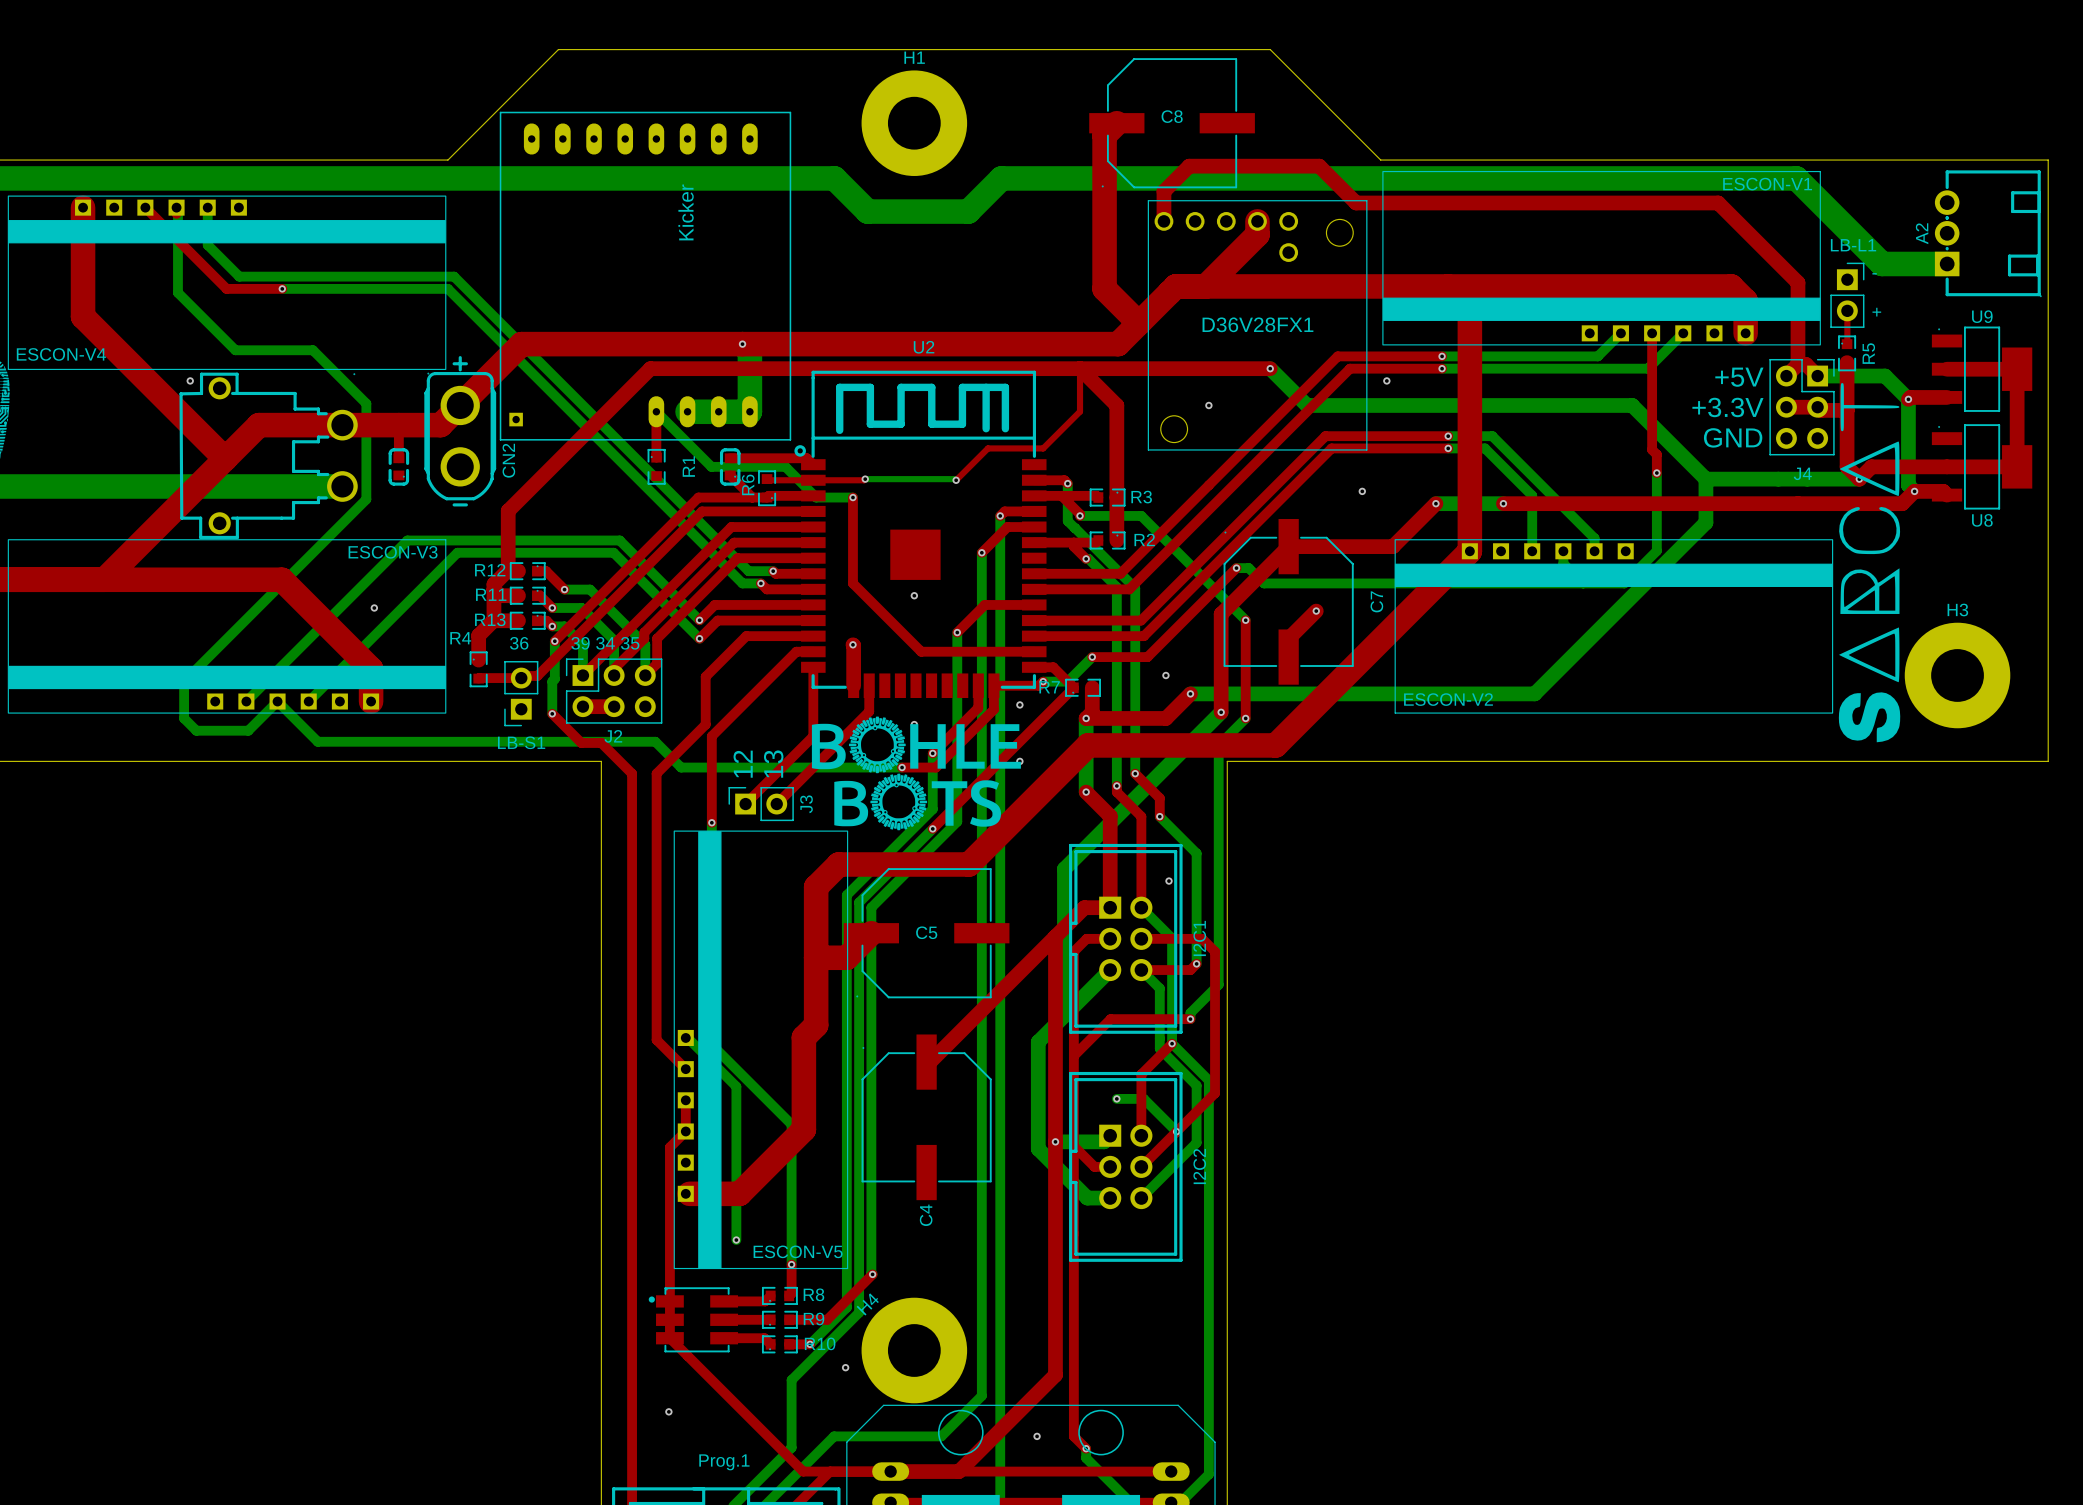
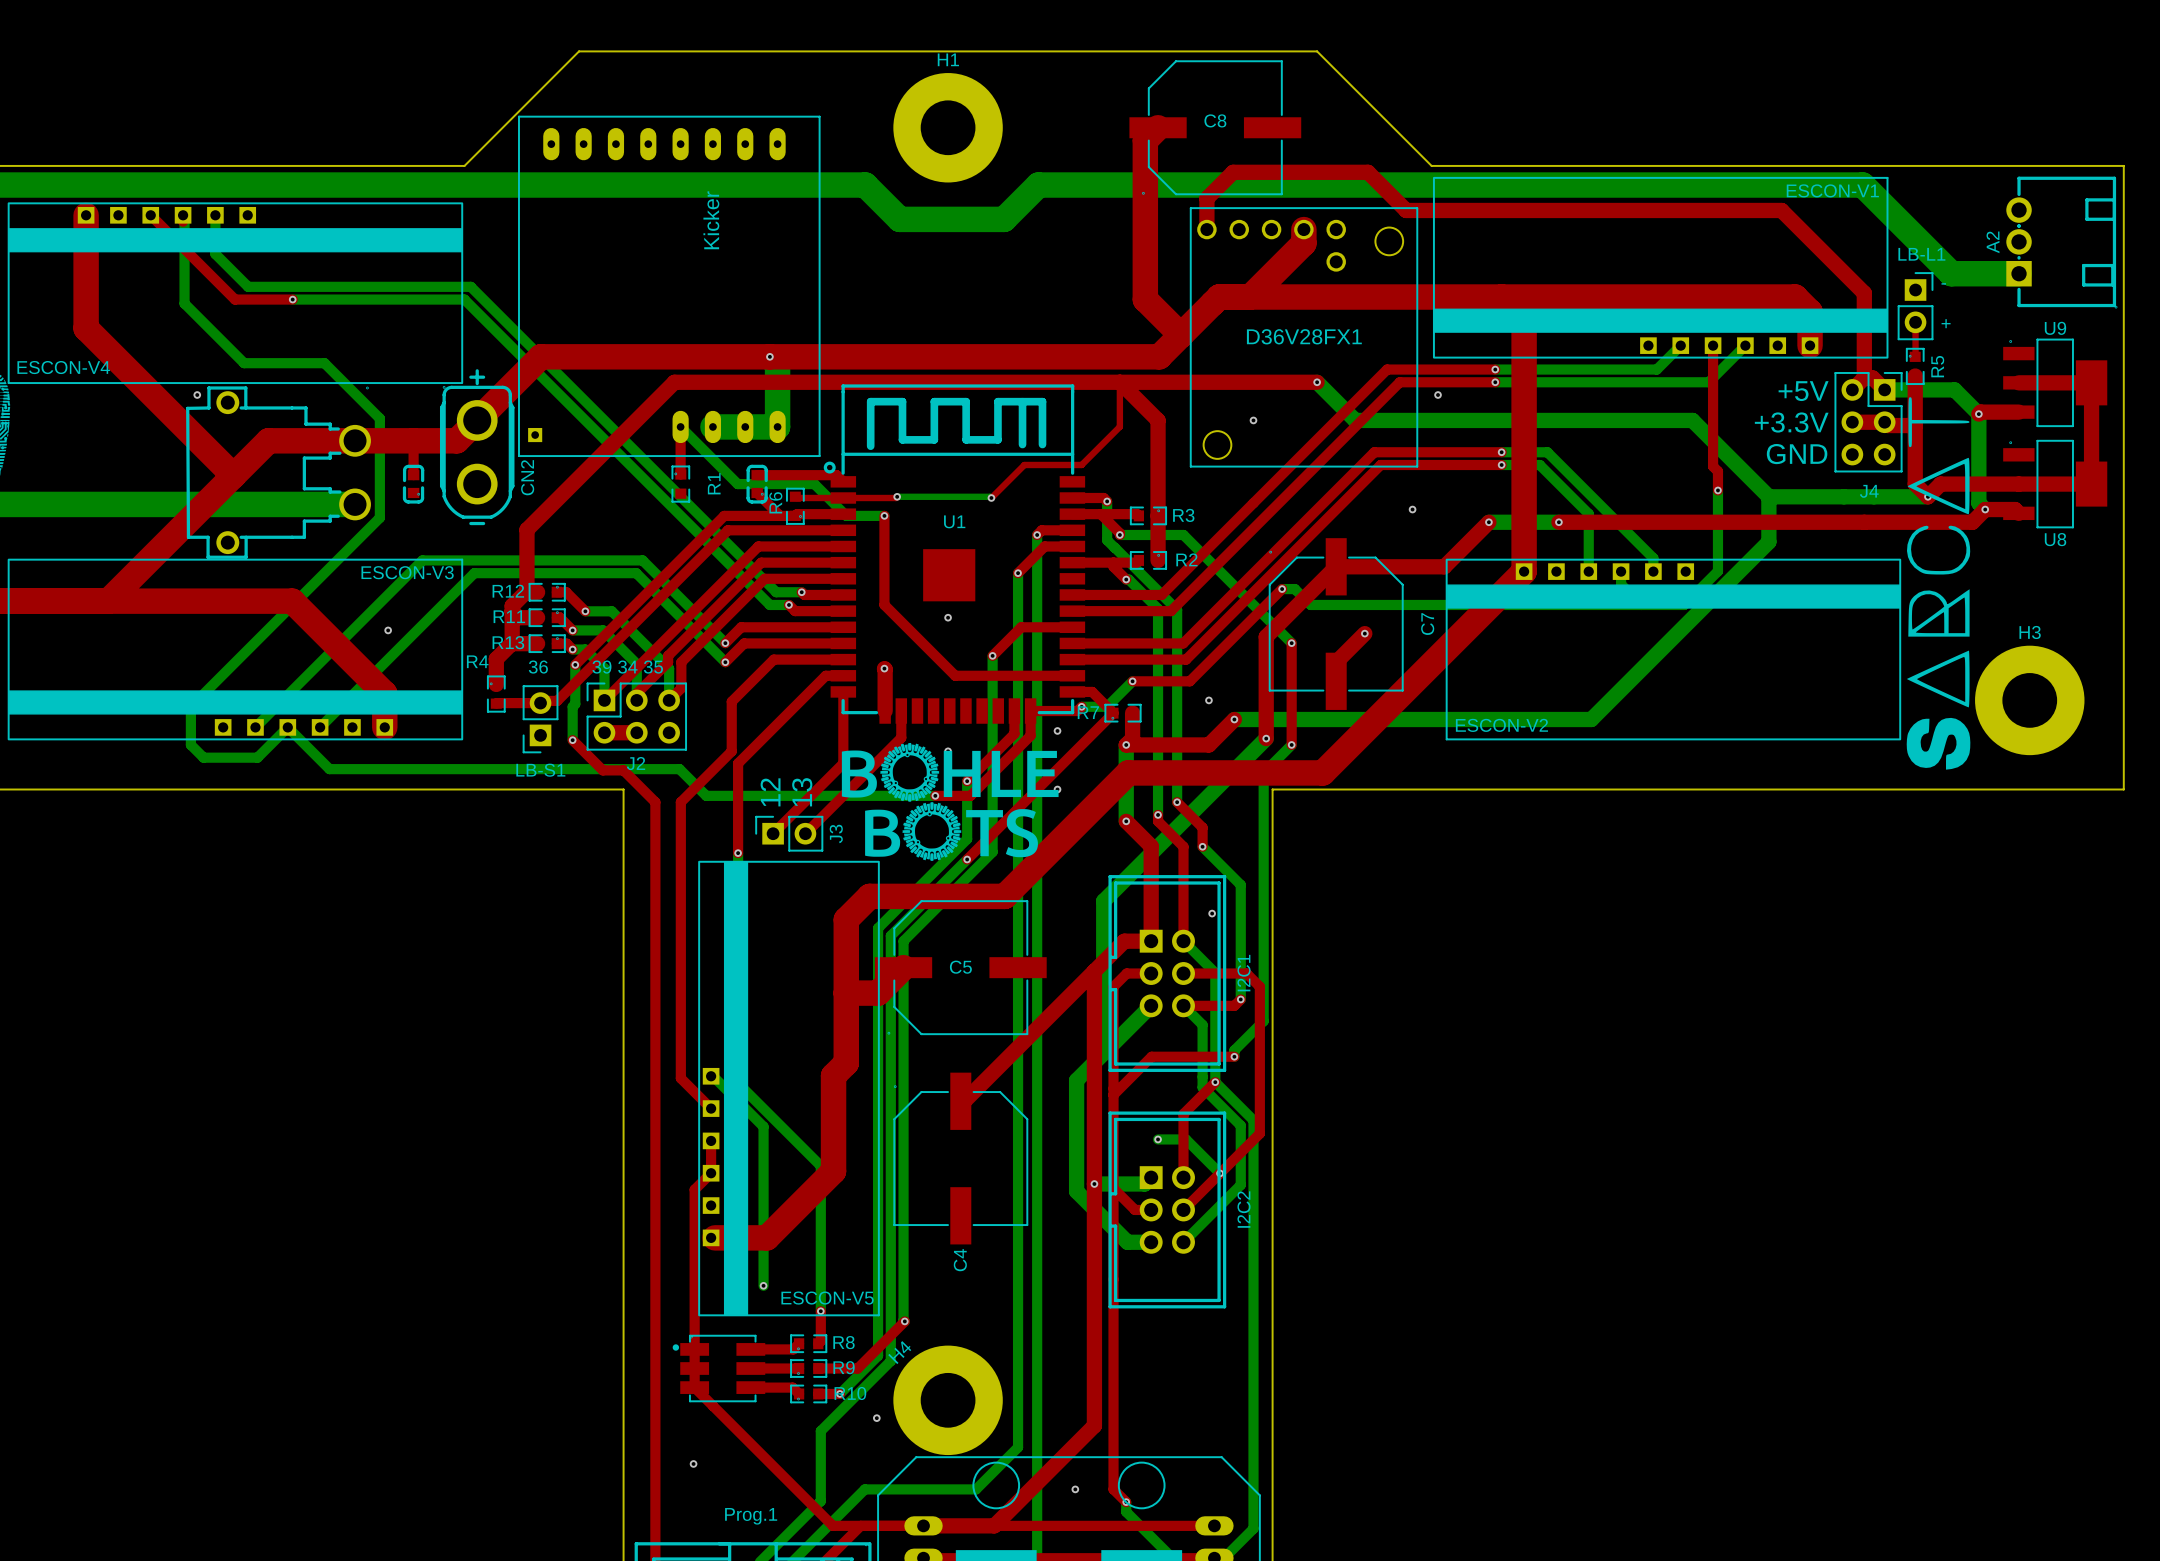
U2 name: U2 (924, 347) -> U1 (954, 521)

